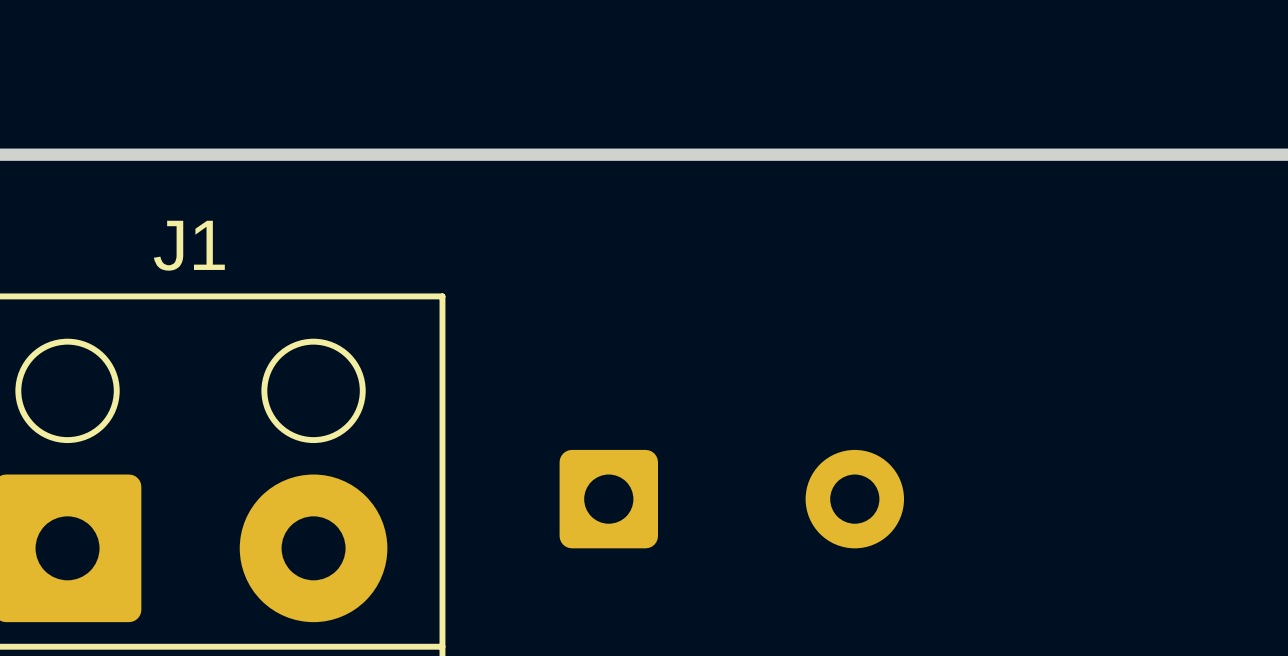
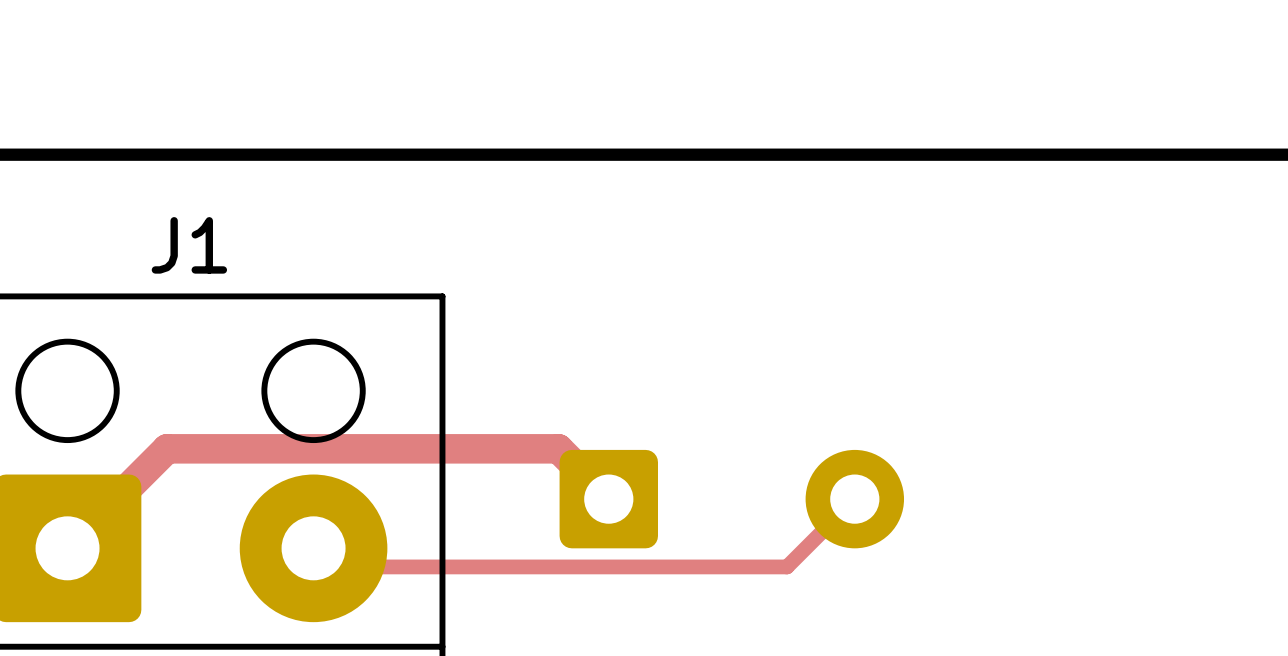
track: none -> (608, 499) (558, 448) (167, 448) (67, 548)
track: none -> (854, 499) (787, 566) (332, 566) (313, 548)

